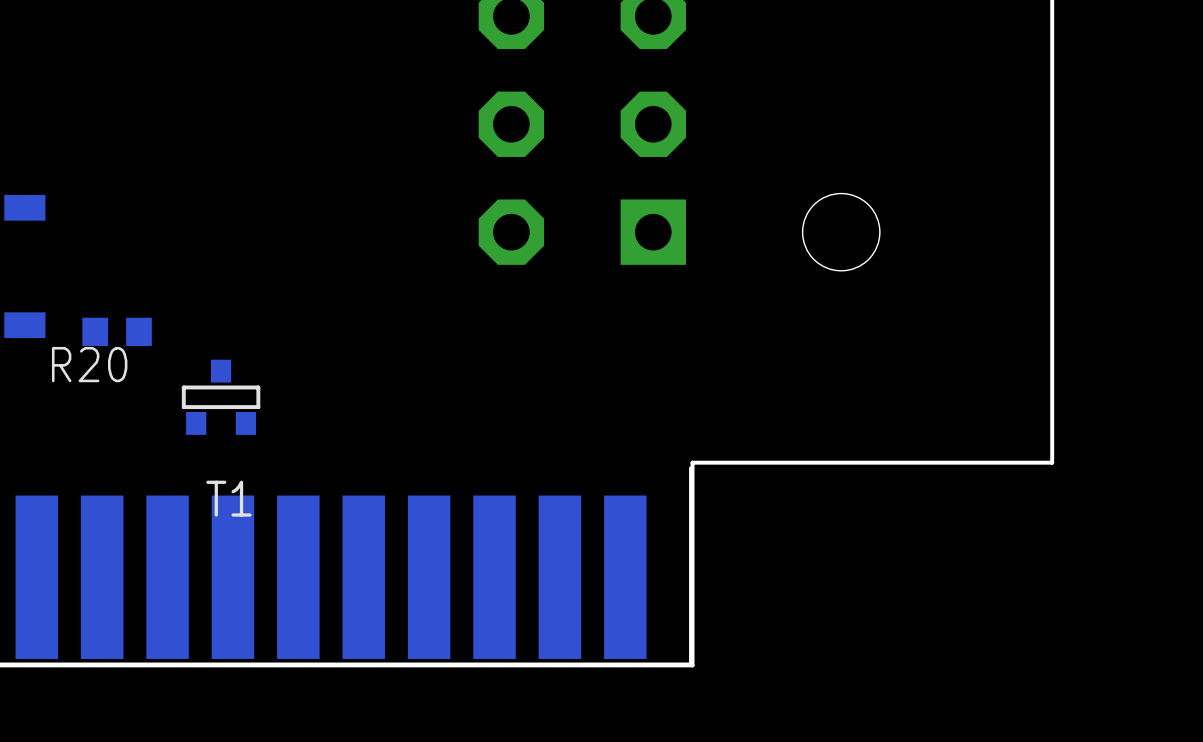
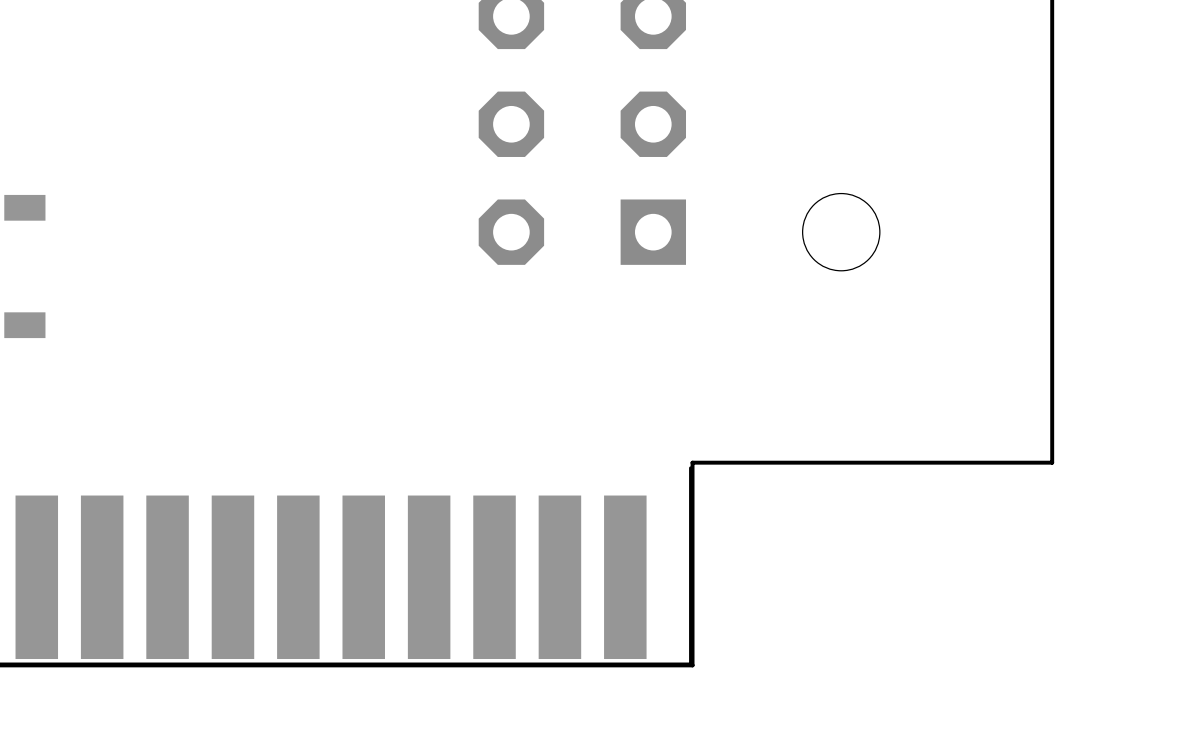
R20: (117, 331) -> none
T1: (221, 397) -> none

